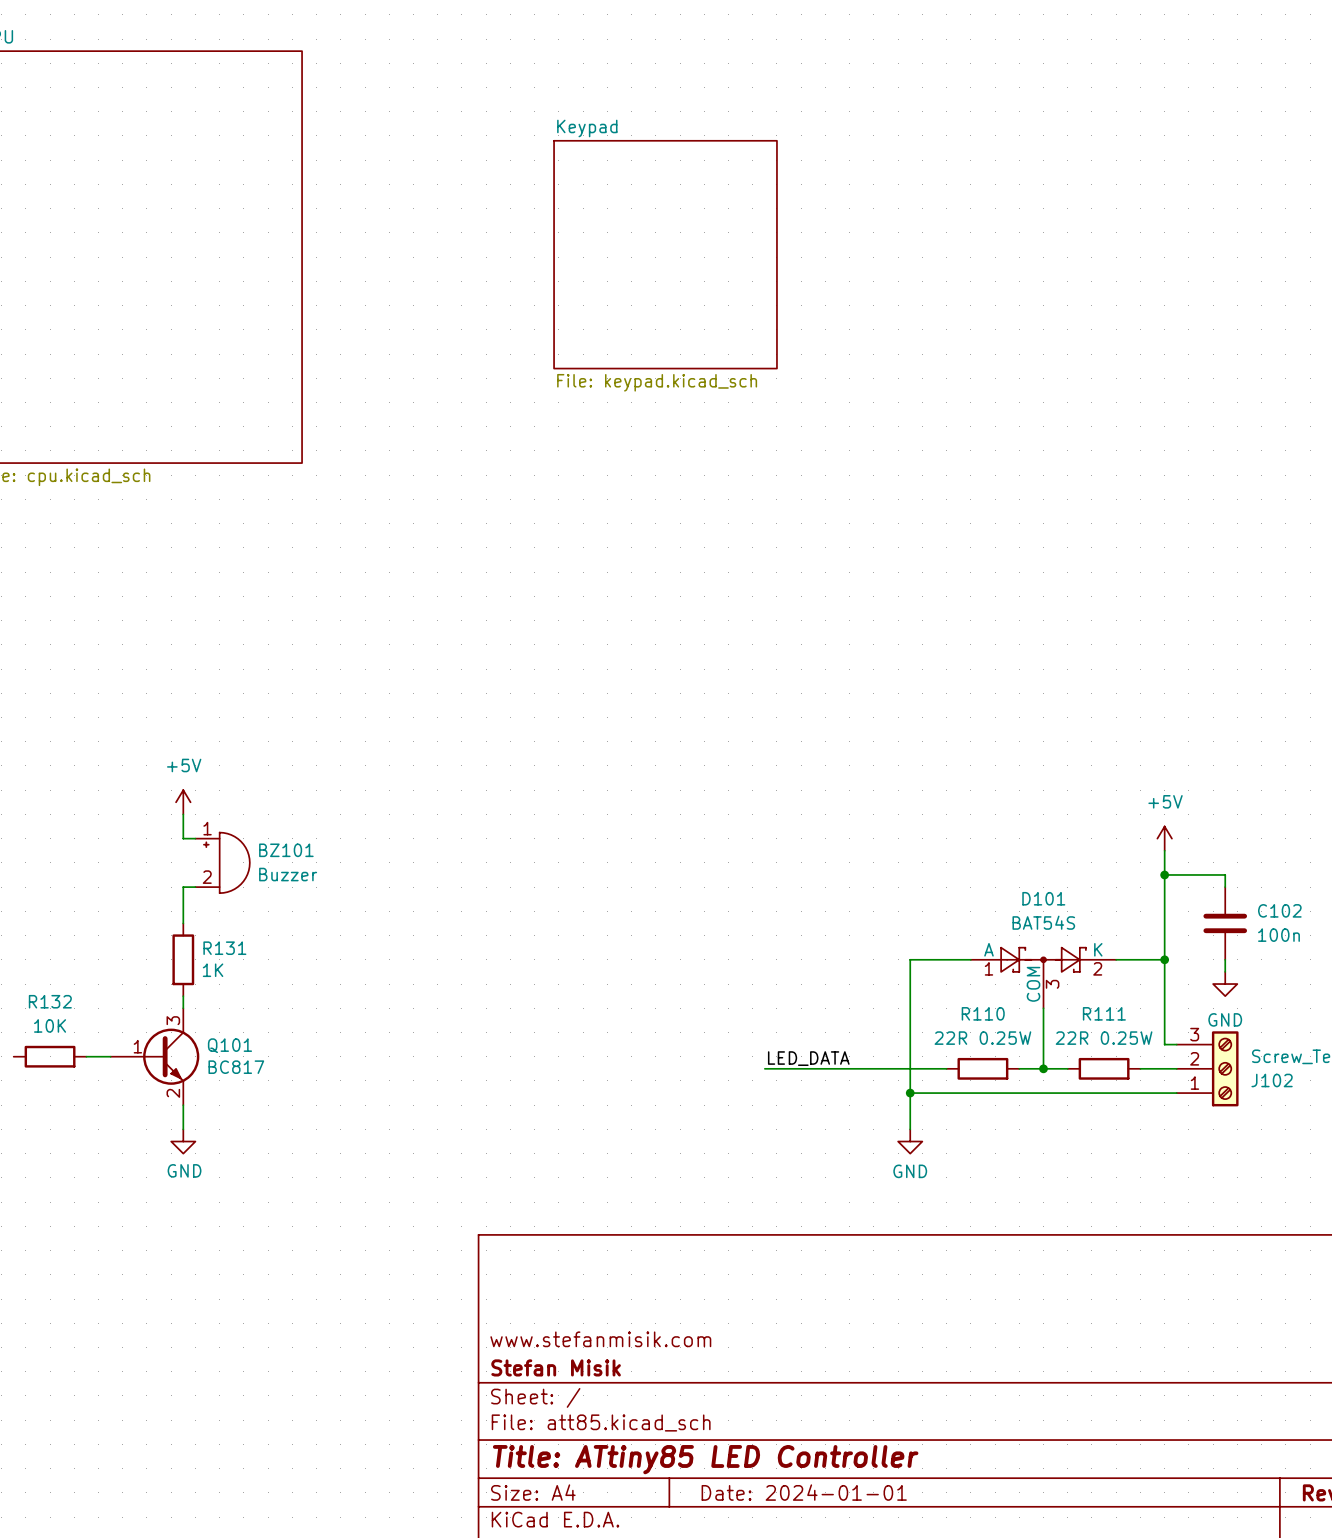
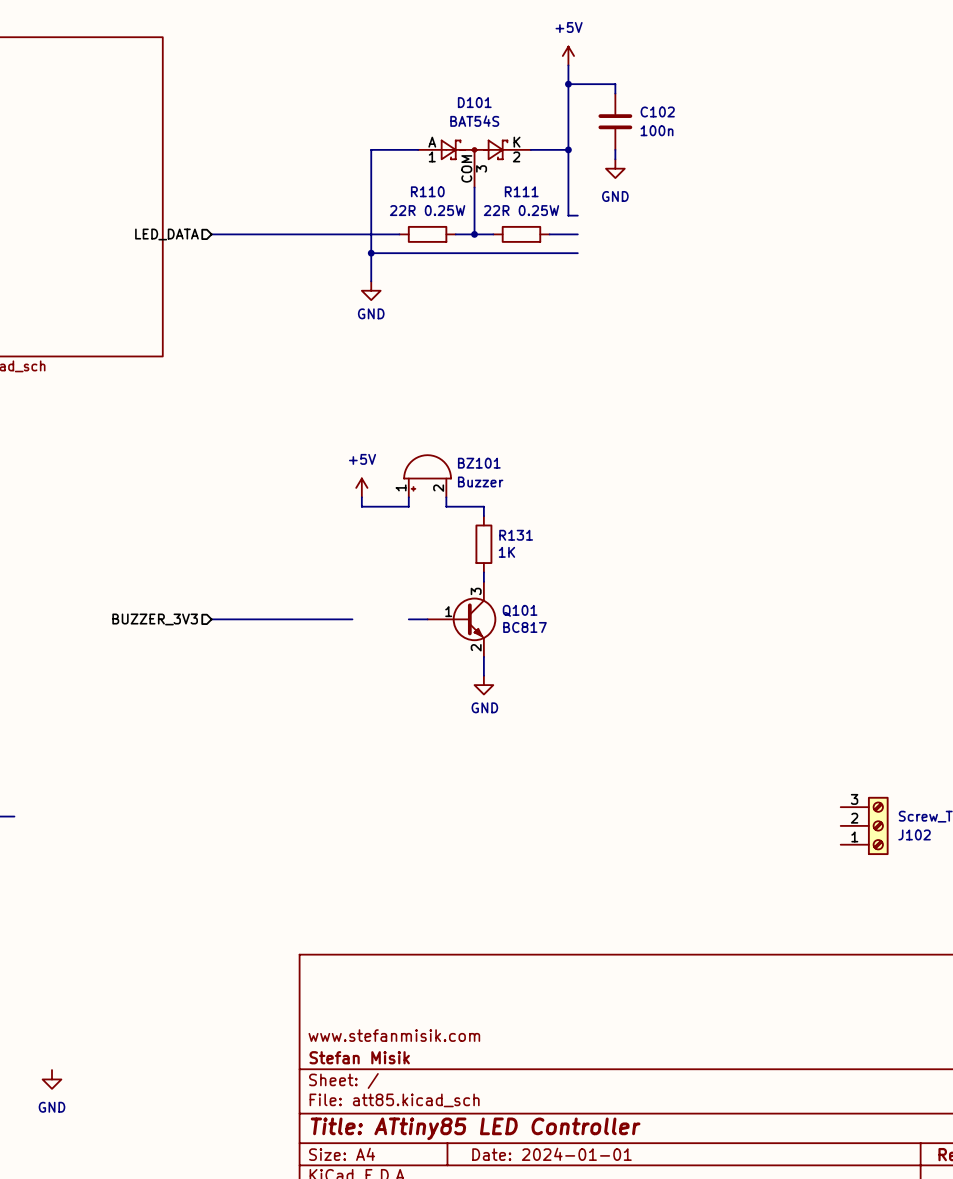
power symbol: none -> +5V (568, 56)
wire: none -> (568, 65) (568, 215) (577, 215)
wire: none -> (568, 84) (615, 84) (615, 93)
junction: none -> (568, 84)
wire: none -> (418, 149) (371, 149) (371, 281)
wire: none -> (530, 149) (568, 149)
junction: none -> (568, 149)
wire: none -> (615, 149) (615, 159)
power symbol: none -> GND (615, 168)
wire: none -> (474, 187) (474, 234)
sheet Keypad: File: keypad.kicad_sch (665, 254) -> none
sheet pin: none -> LED_DATA (166, 234)
wire: none -> (211, 234) (399, 234)
wire: none -> (455, 234) (493, 234)
junction: none -> (474, 234)
wire: none -> (549, 234) (577, 234)
wire: none -> (371, 253) (577, 253)
junction: none -> (371, 253)
power symbol: none -> GND (371, 290)
power symbol: none -> +5V (361, 487)
wire: none -> (361, 497) (361, 506) (408, 506) (408, 497)
wire: none -> (446, 497) (446, 506) (483, 506) (483, 516)
wire: none -> (483, 572) (483, 581)
power symbol: +5V (183, 802) -> none
sheet pin: none -> BUZZER_3V3 (155, 619)
wire: none -> (211, 619) (352, 619)
wire: none -> (408, 619) (427, 619)
wire: (183, 814) (183, 838) (195, 838) -> none
power symbol: +5V (1164, 838) -> none
wire: none -> (483, 656) (483, 675)
wire: (1164, 850) (1164, 1044) (1176, 1044) -> none
BZ101 position: (222, 862) -> (427, 476)
BZ101 rotation: 0° (226, 862) -> 90° counterclockwise (427, 472)
wire: (1164, 874) (1225, 874) (1225, 887) -> none
junction: (1164, 874) -> none
wire: (195, 887) (183, 887) (183, 923) -> none
power symbol: none -> GND (483, 685)
C102 position: (1225, 923) -> (615, 121)
R131 position: (183, 959) -> (483, 544)
wire: (970, 959) (910, 959) (910, 1129) -> none
wire: (1116, 959) (1164, 959) -> none
junction: (1164, 959) -> none
wire: (1225, 959) (1225, 971) -> none
D101 position: (1043, 977) -> (474, 163)
power symbol: GND (1225, 984) -> none
wire: (183, 996) (183, 1008) -> none
wire: (1043, 1008) (1043, 1068) -> none
Q101 position: (154, 1056) -> (461, 619)
label: LED_DATA (808, 1058) -> none
wire: (764, 1068) (946, 1068) -> none
R110 position: (982, 1068) -> (427, 234)
wire: (1019, 1068) (1067, 1068) -> none
junction: (1043, 1068) -> none
R111 position: (1104, 1068) -> (521, 234)
wire: (1140, 1068) (1176, 1068) -> none
wire: (910, 1093) (1176, 1093) -> none
junction: (910, 1093) -> none
wire: (183, 1105) (183, 1129) -> none
power symbol: GND (183, 1141) -> none
power symbol: GND (910, 1141) -> none
power symbol: none -> GND (52, 1079)

